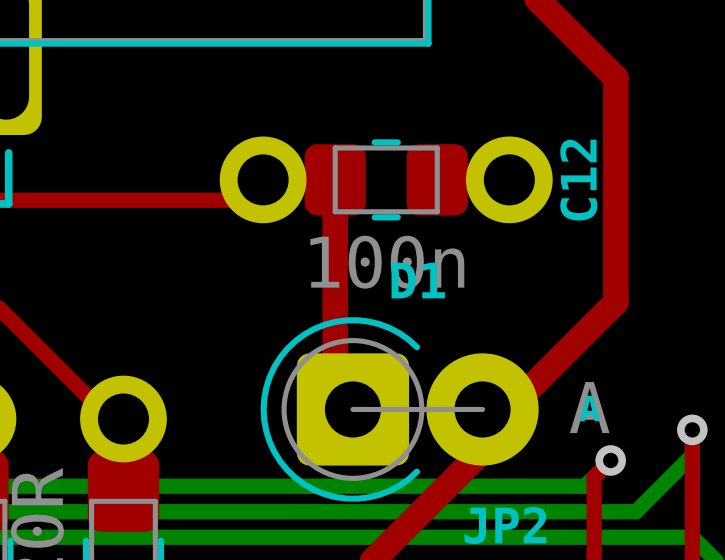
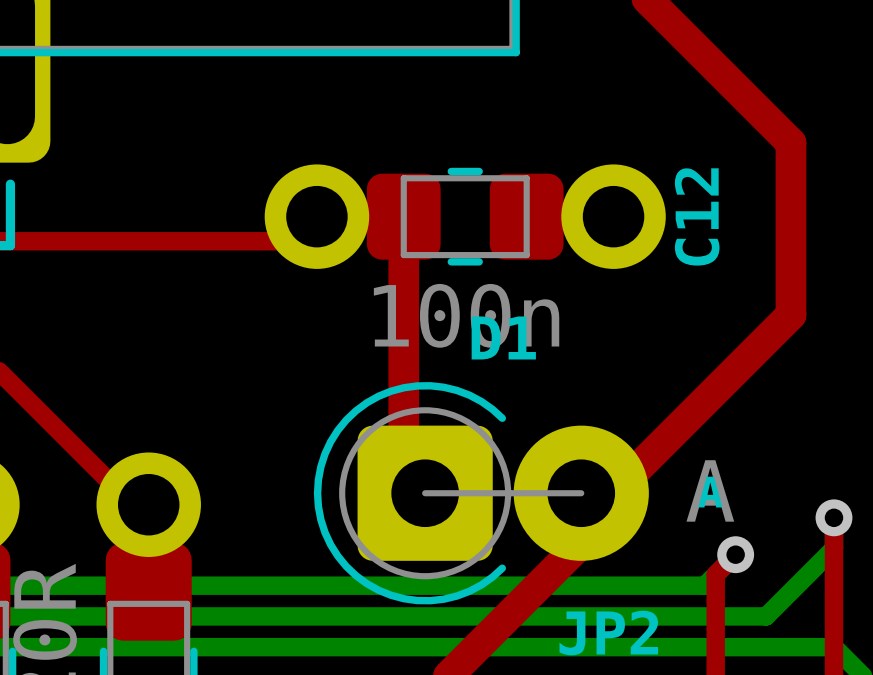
top track: (615, 77) (615, 302) -> (741, 93) (790, 142) (790, 315) (741, 364)

